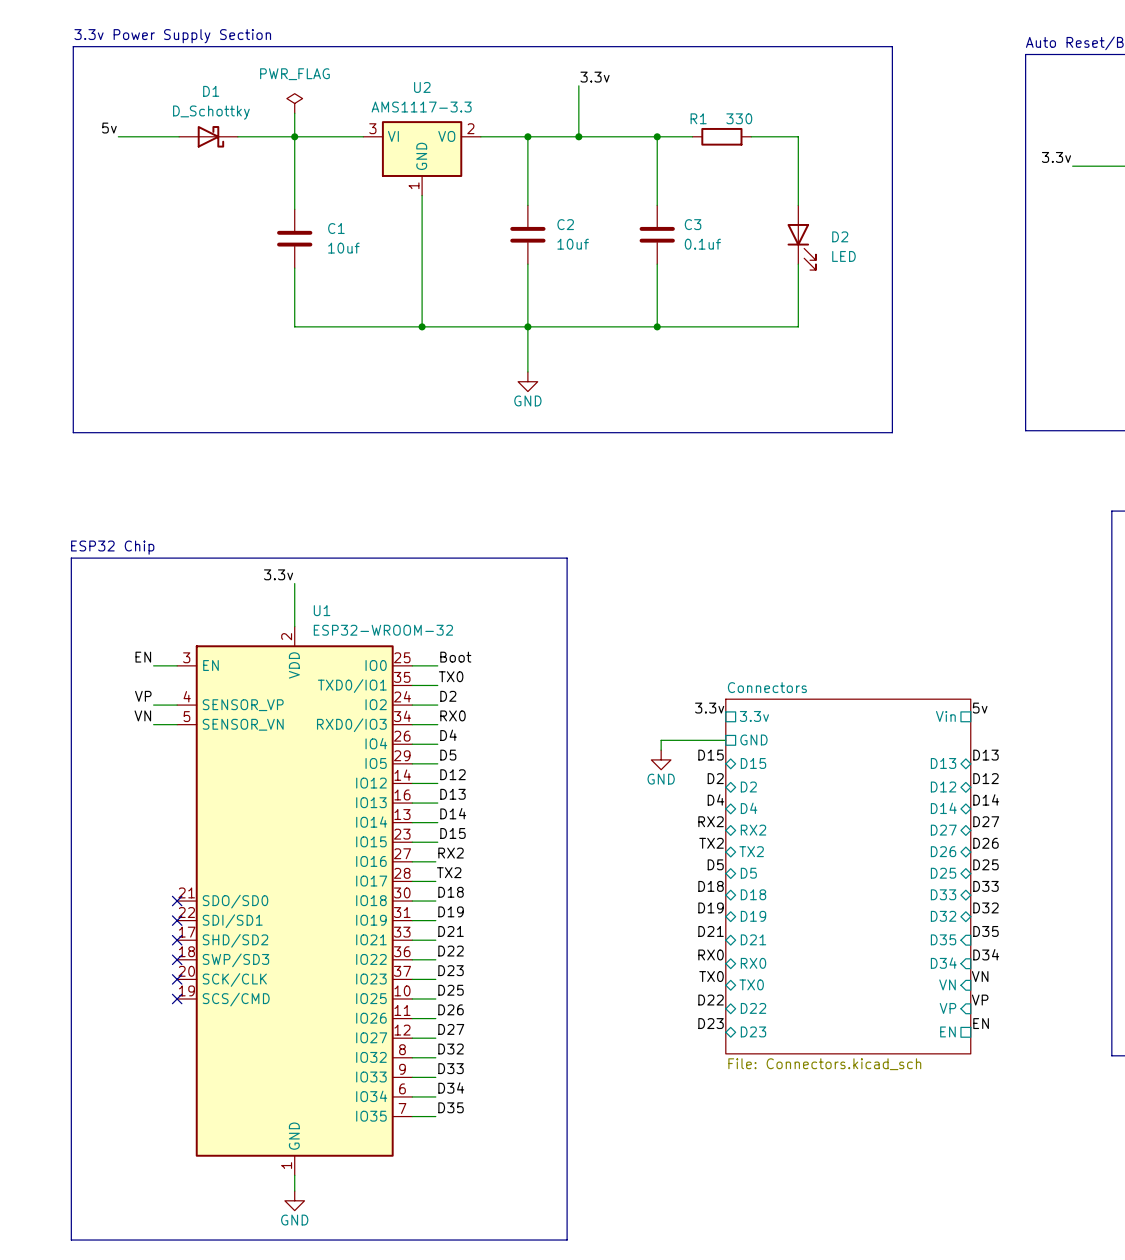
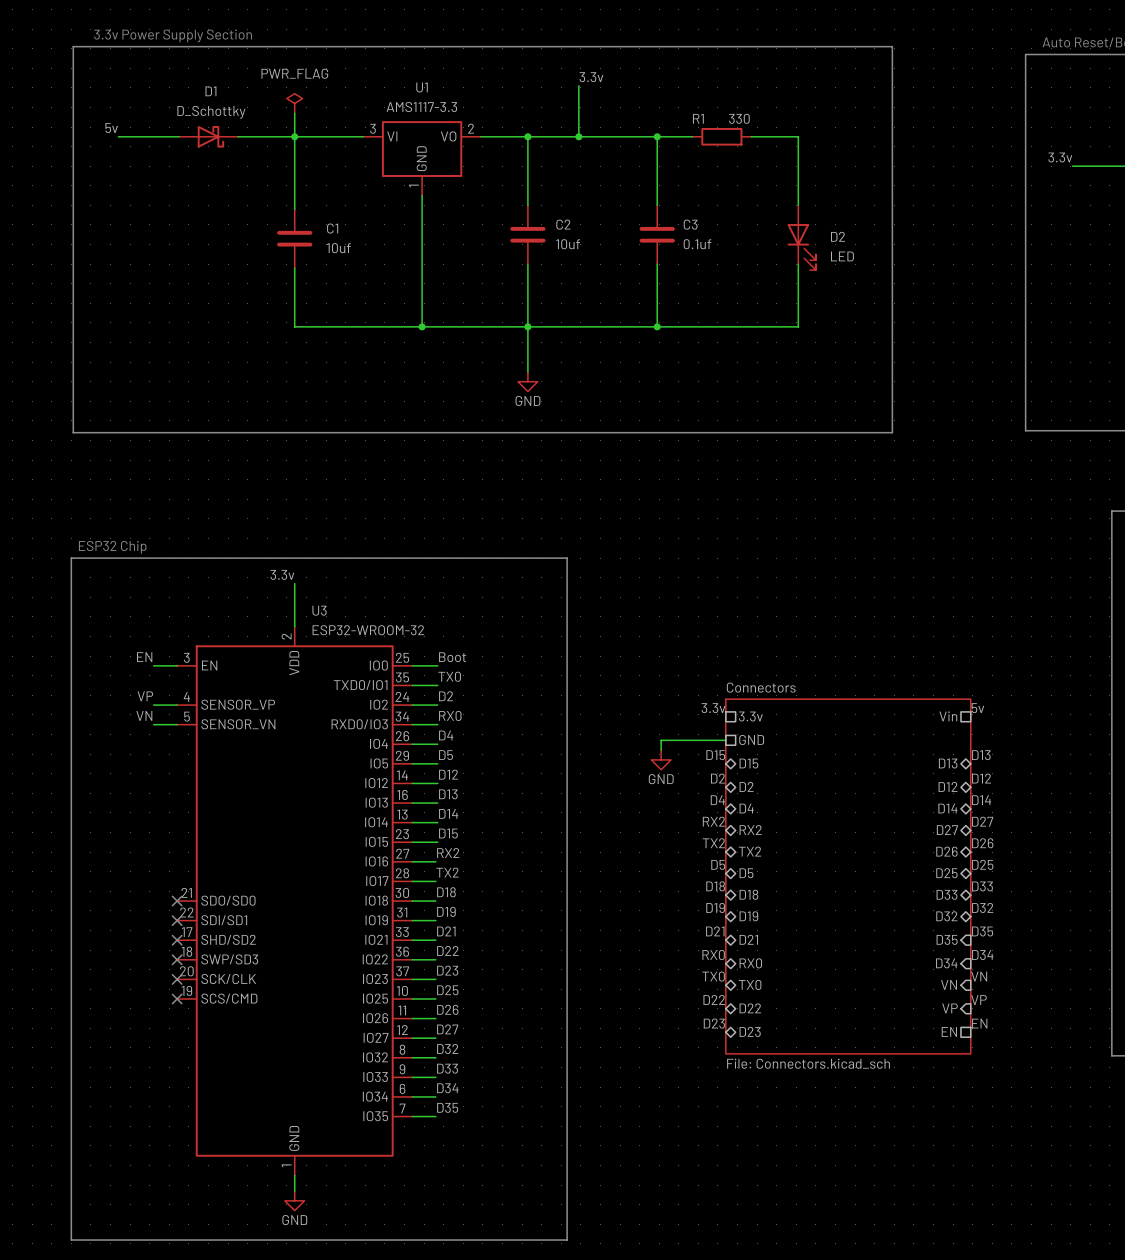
U2 name: U2 (422, 87) -> U1 (422, 87)
U1 name: U1 (322, 610) -> U3 (319, 610)

